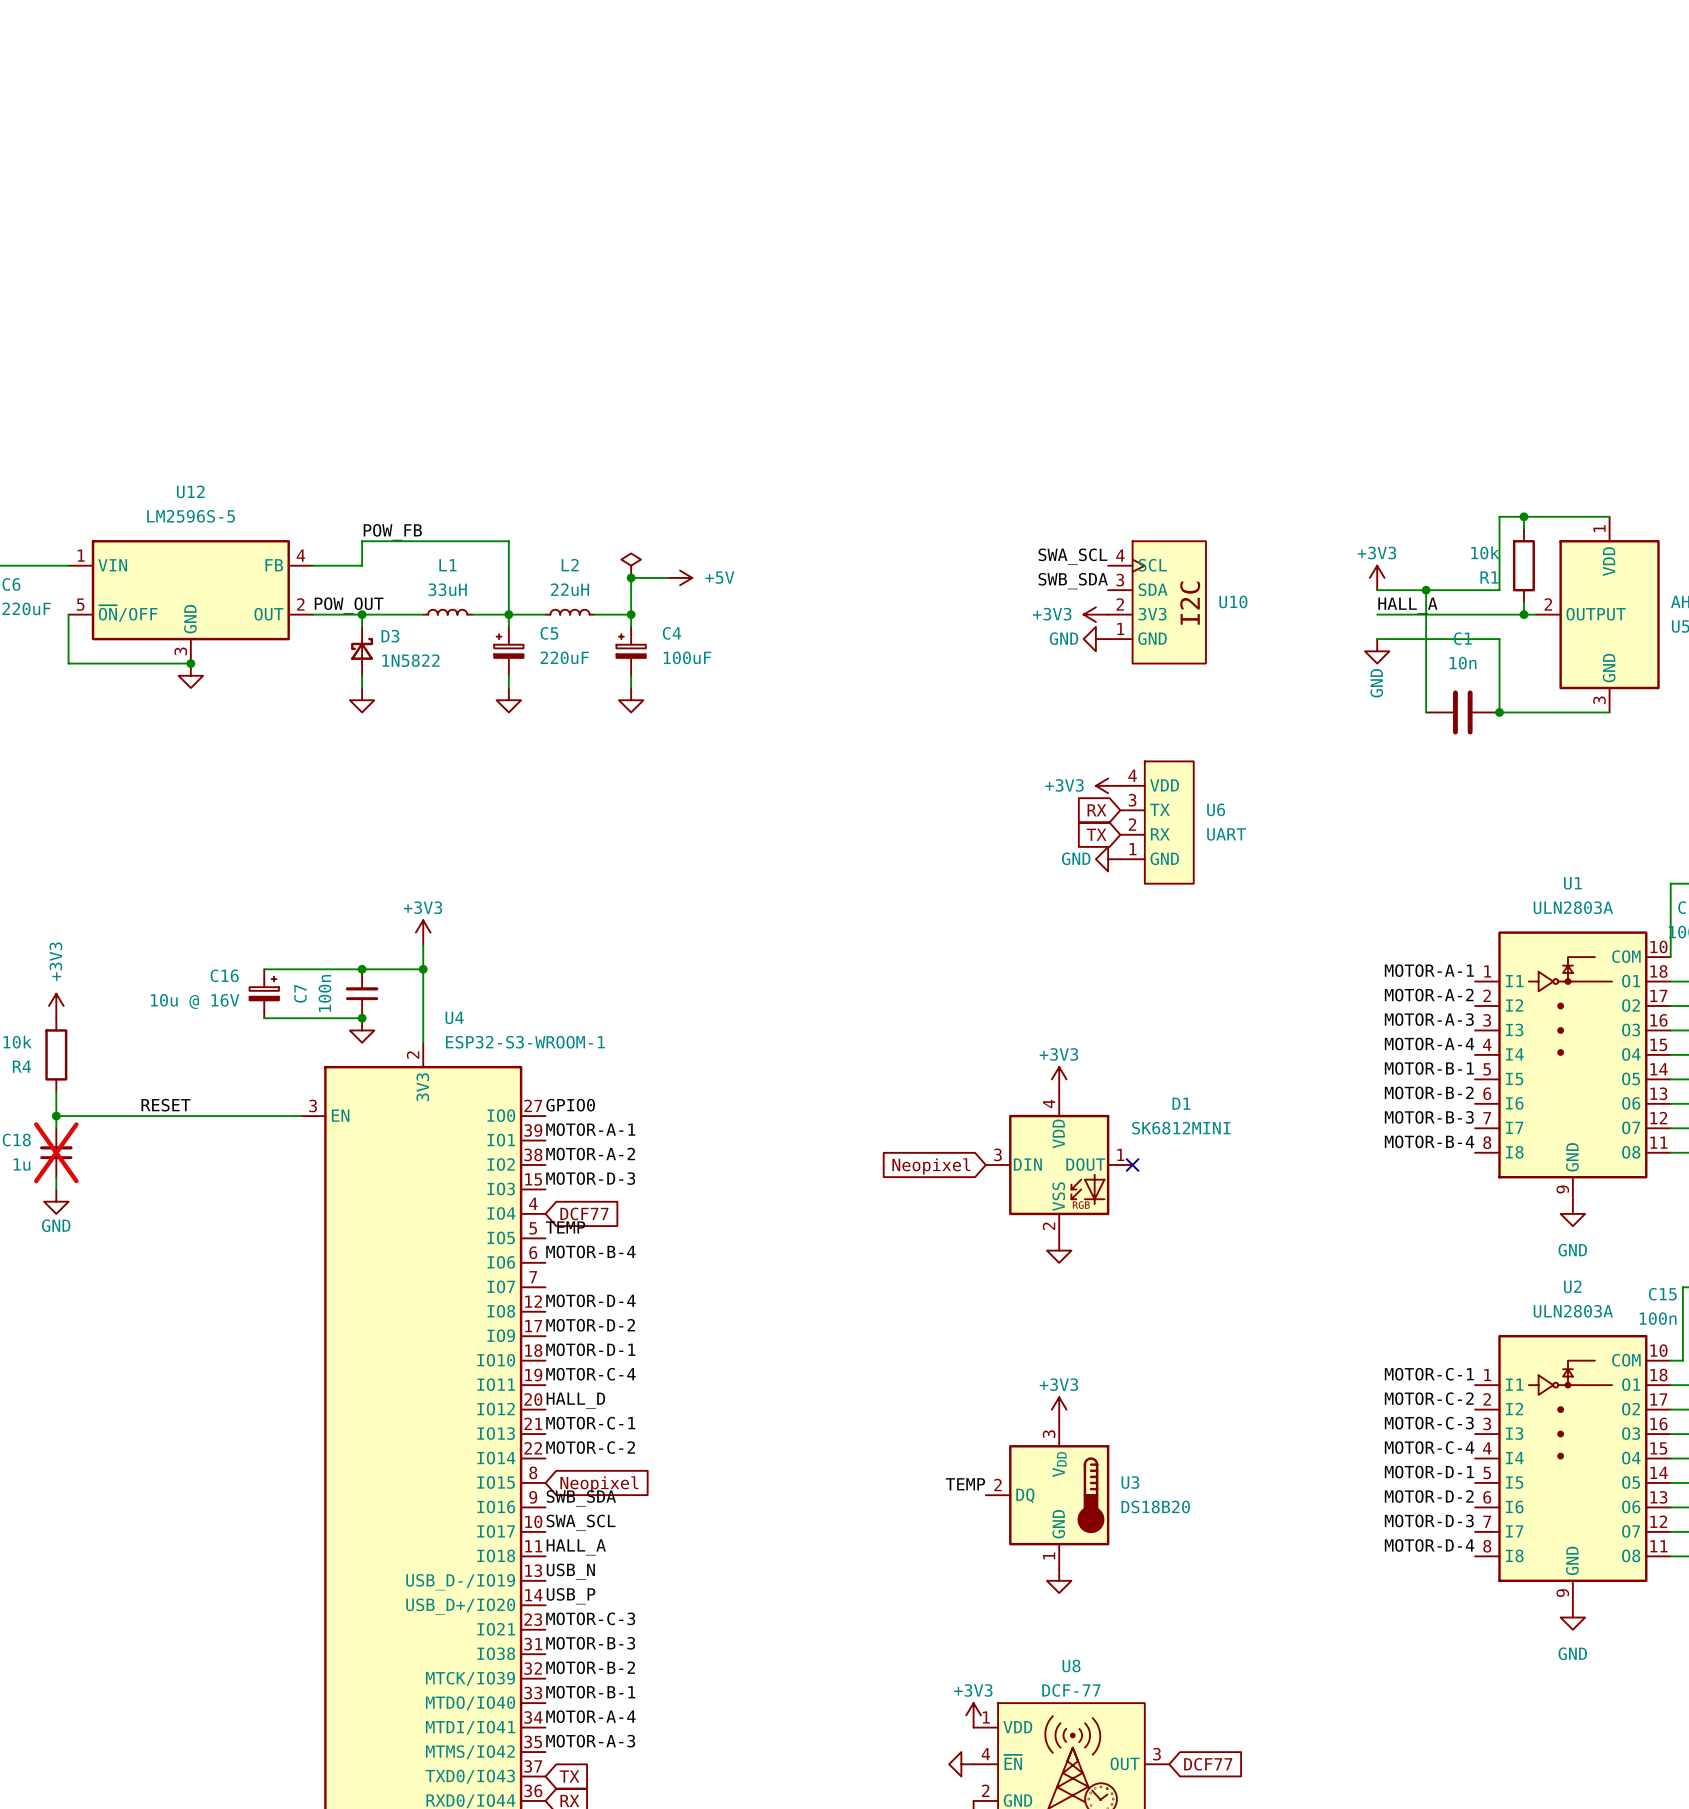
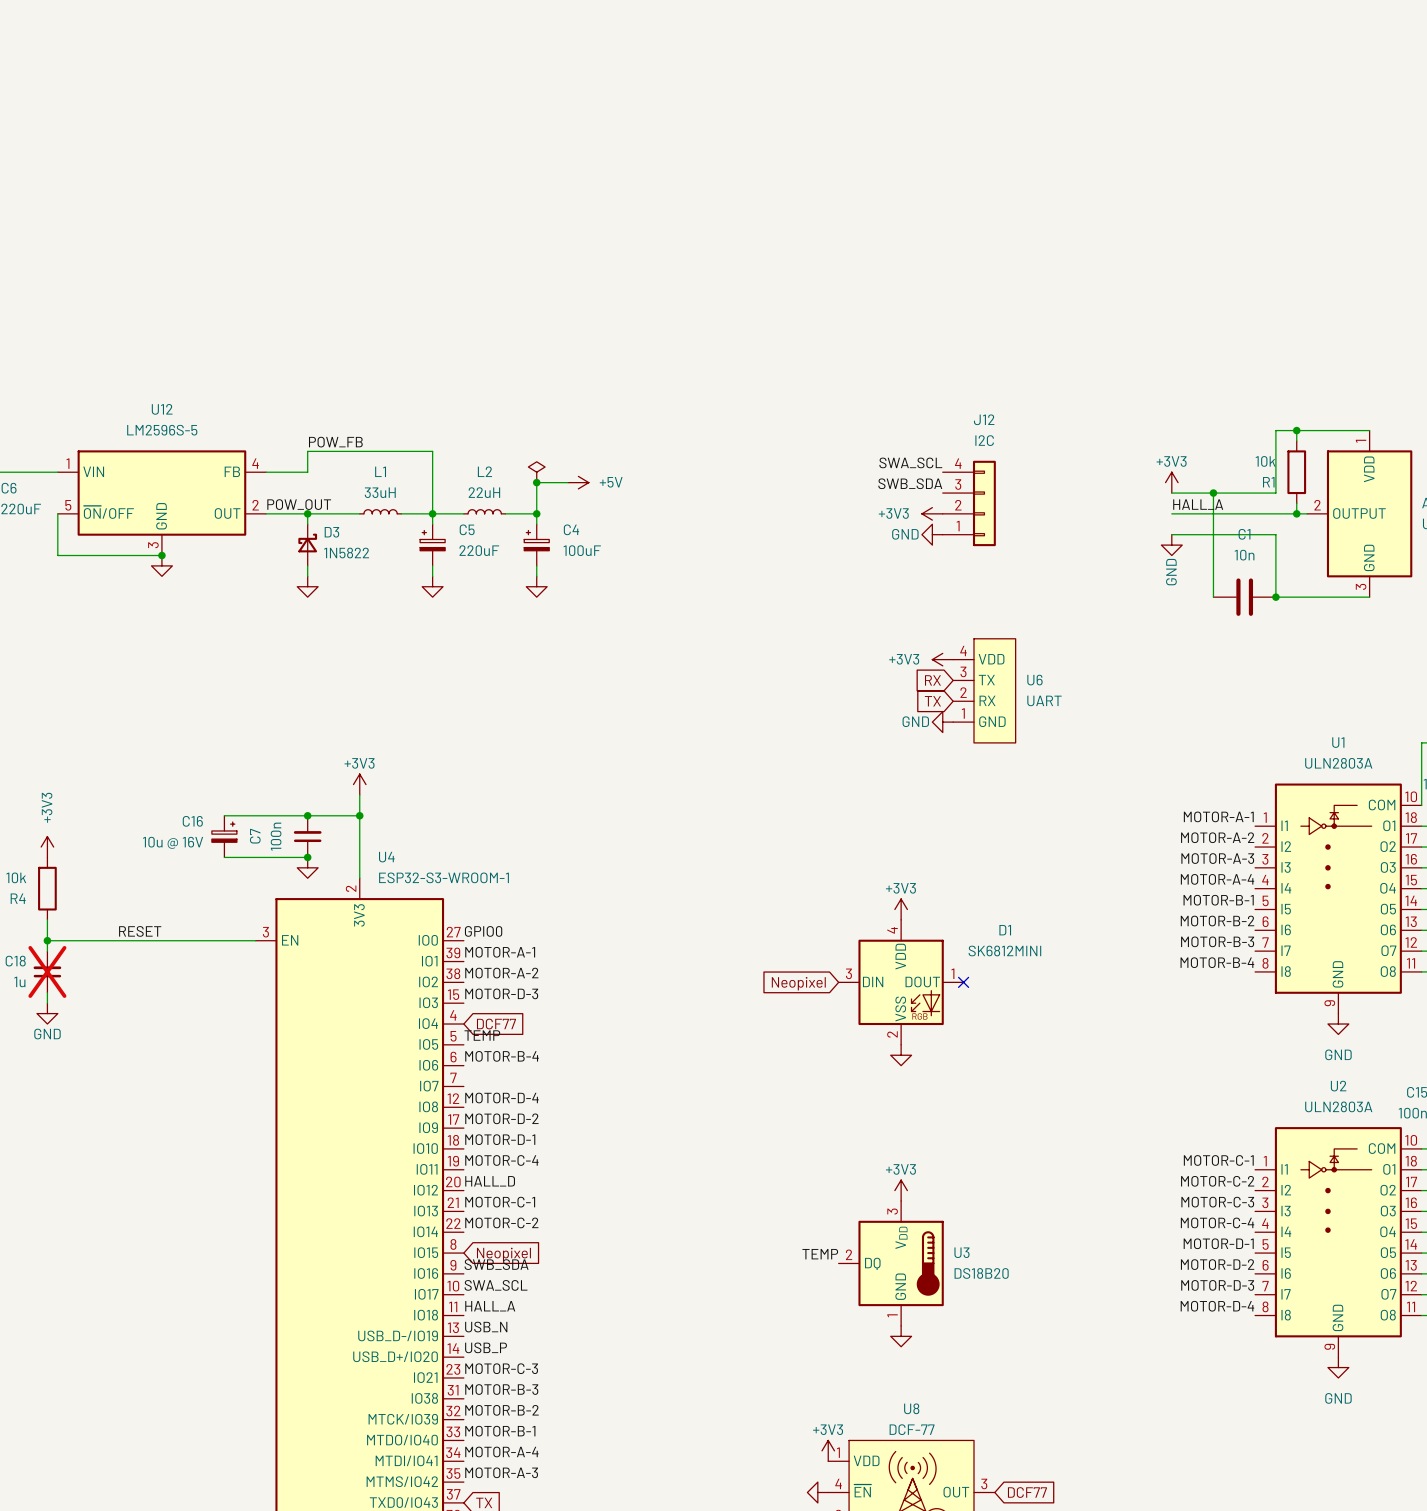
J12: none -> I2C (969, 503)
U10: (1157, 602) -> none

